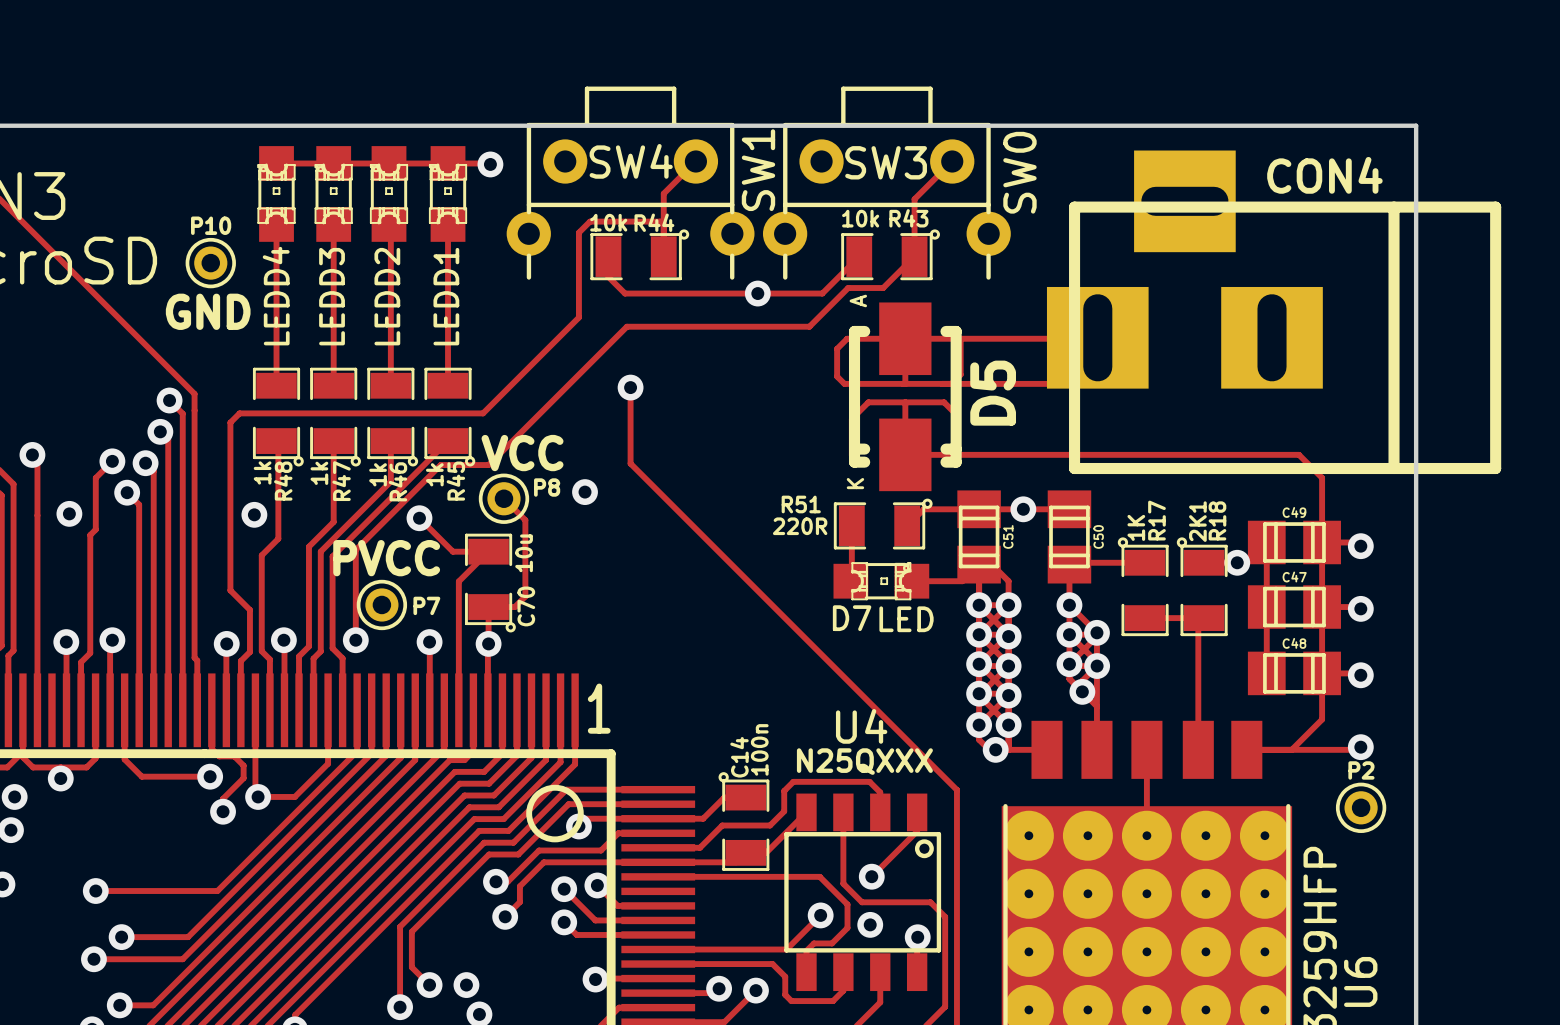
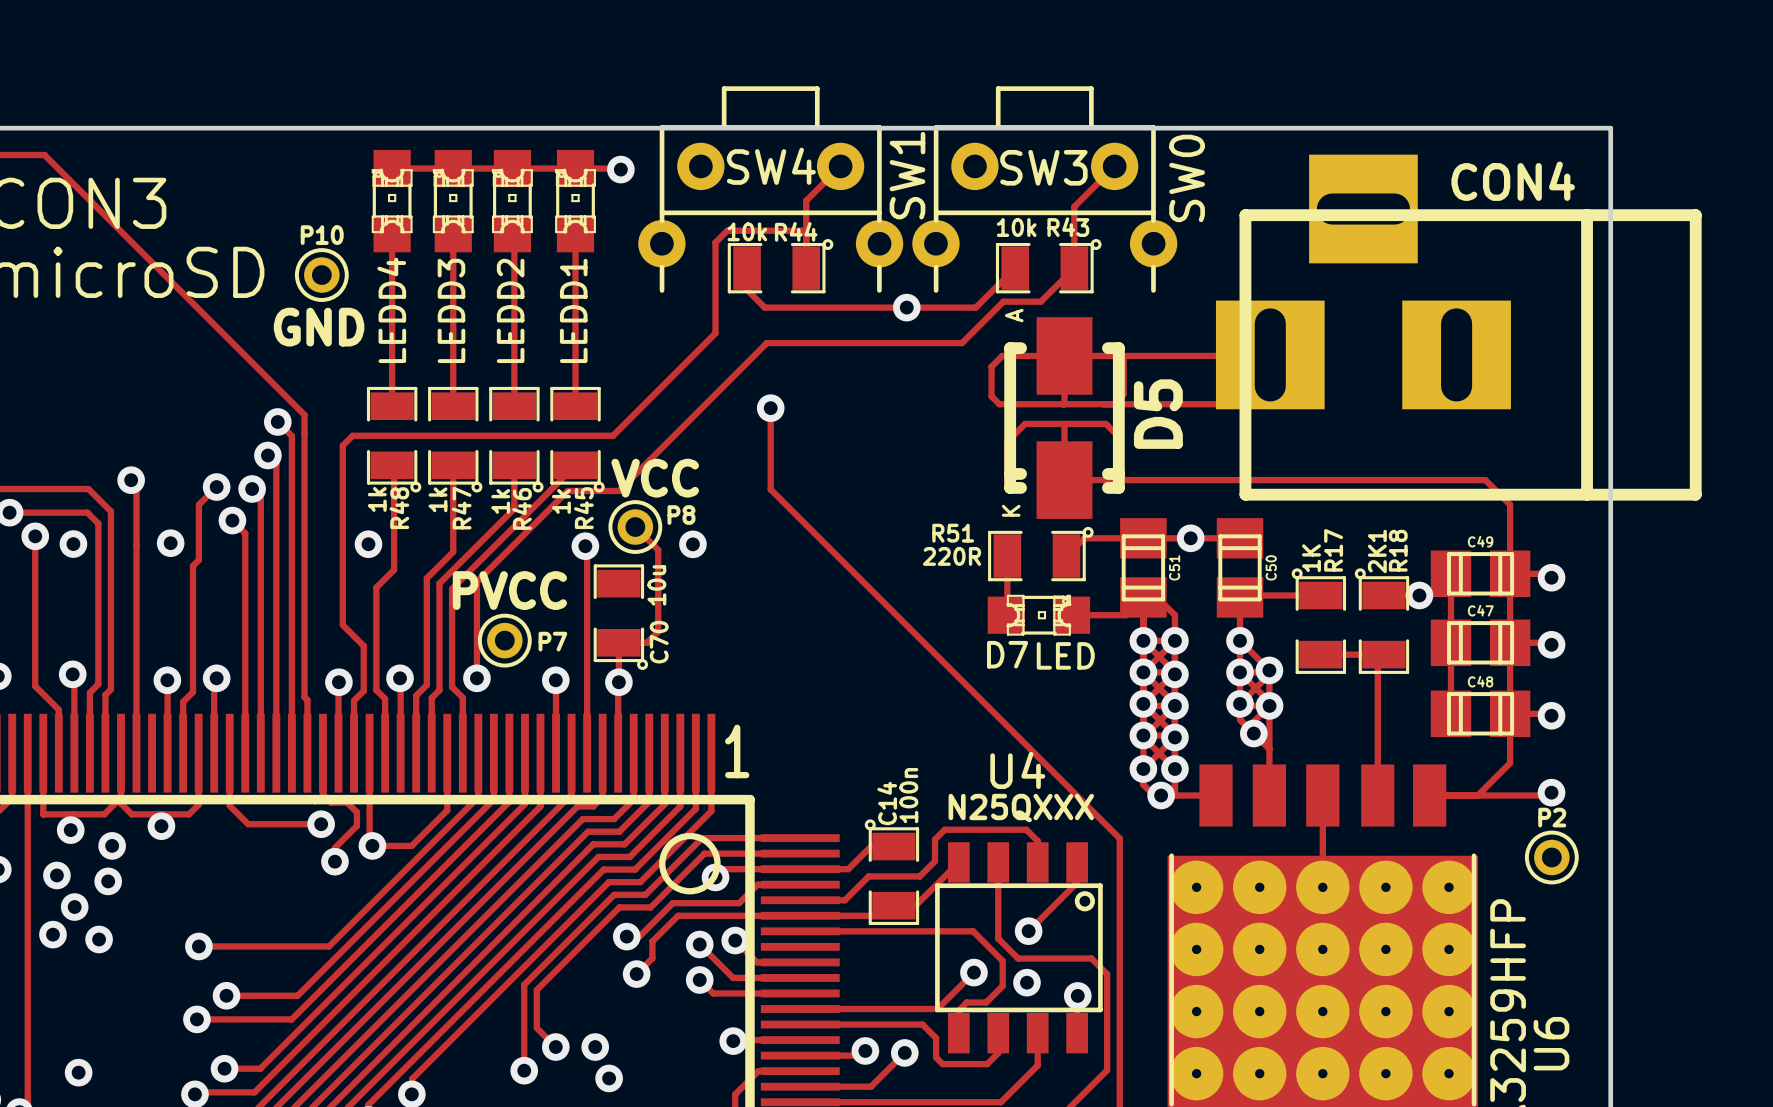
via position: (585, 492) -> (692, 544)
track: (419, 518) (452, 551) (488, 551) (458, 581) -> (585, 546) (587, 547) (587, 615)
via position: (419, 518) -> (585, 546)

